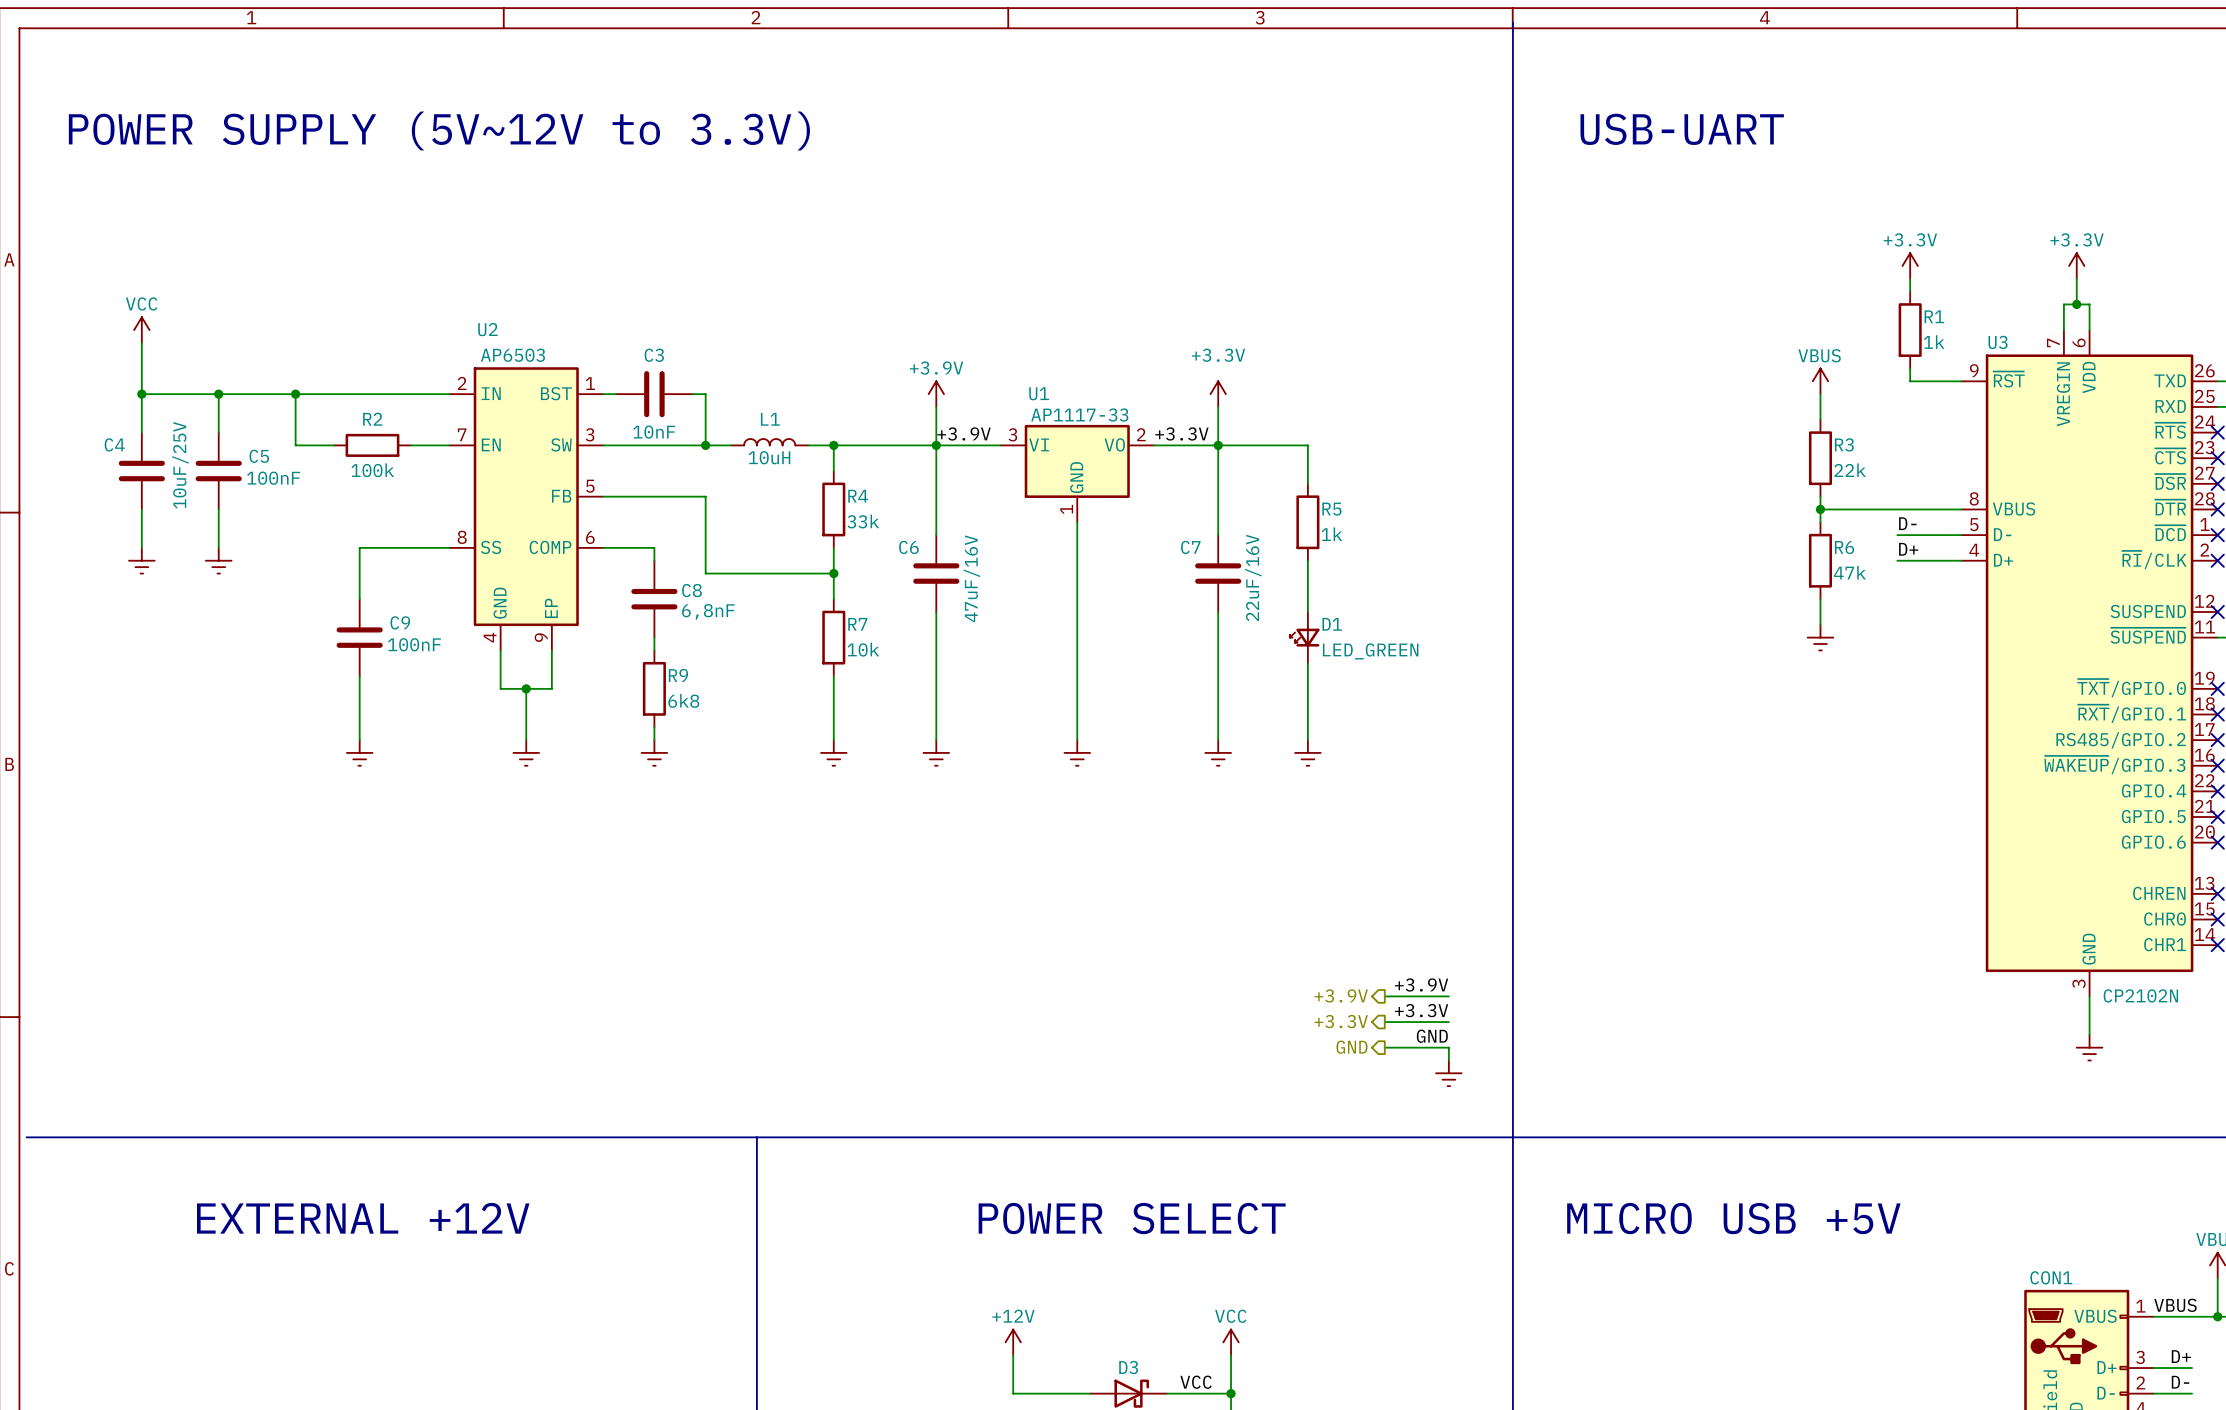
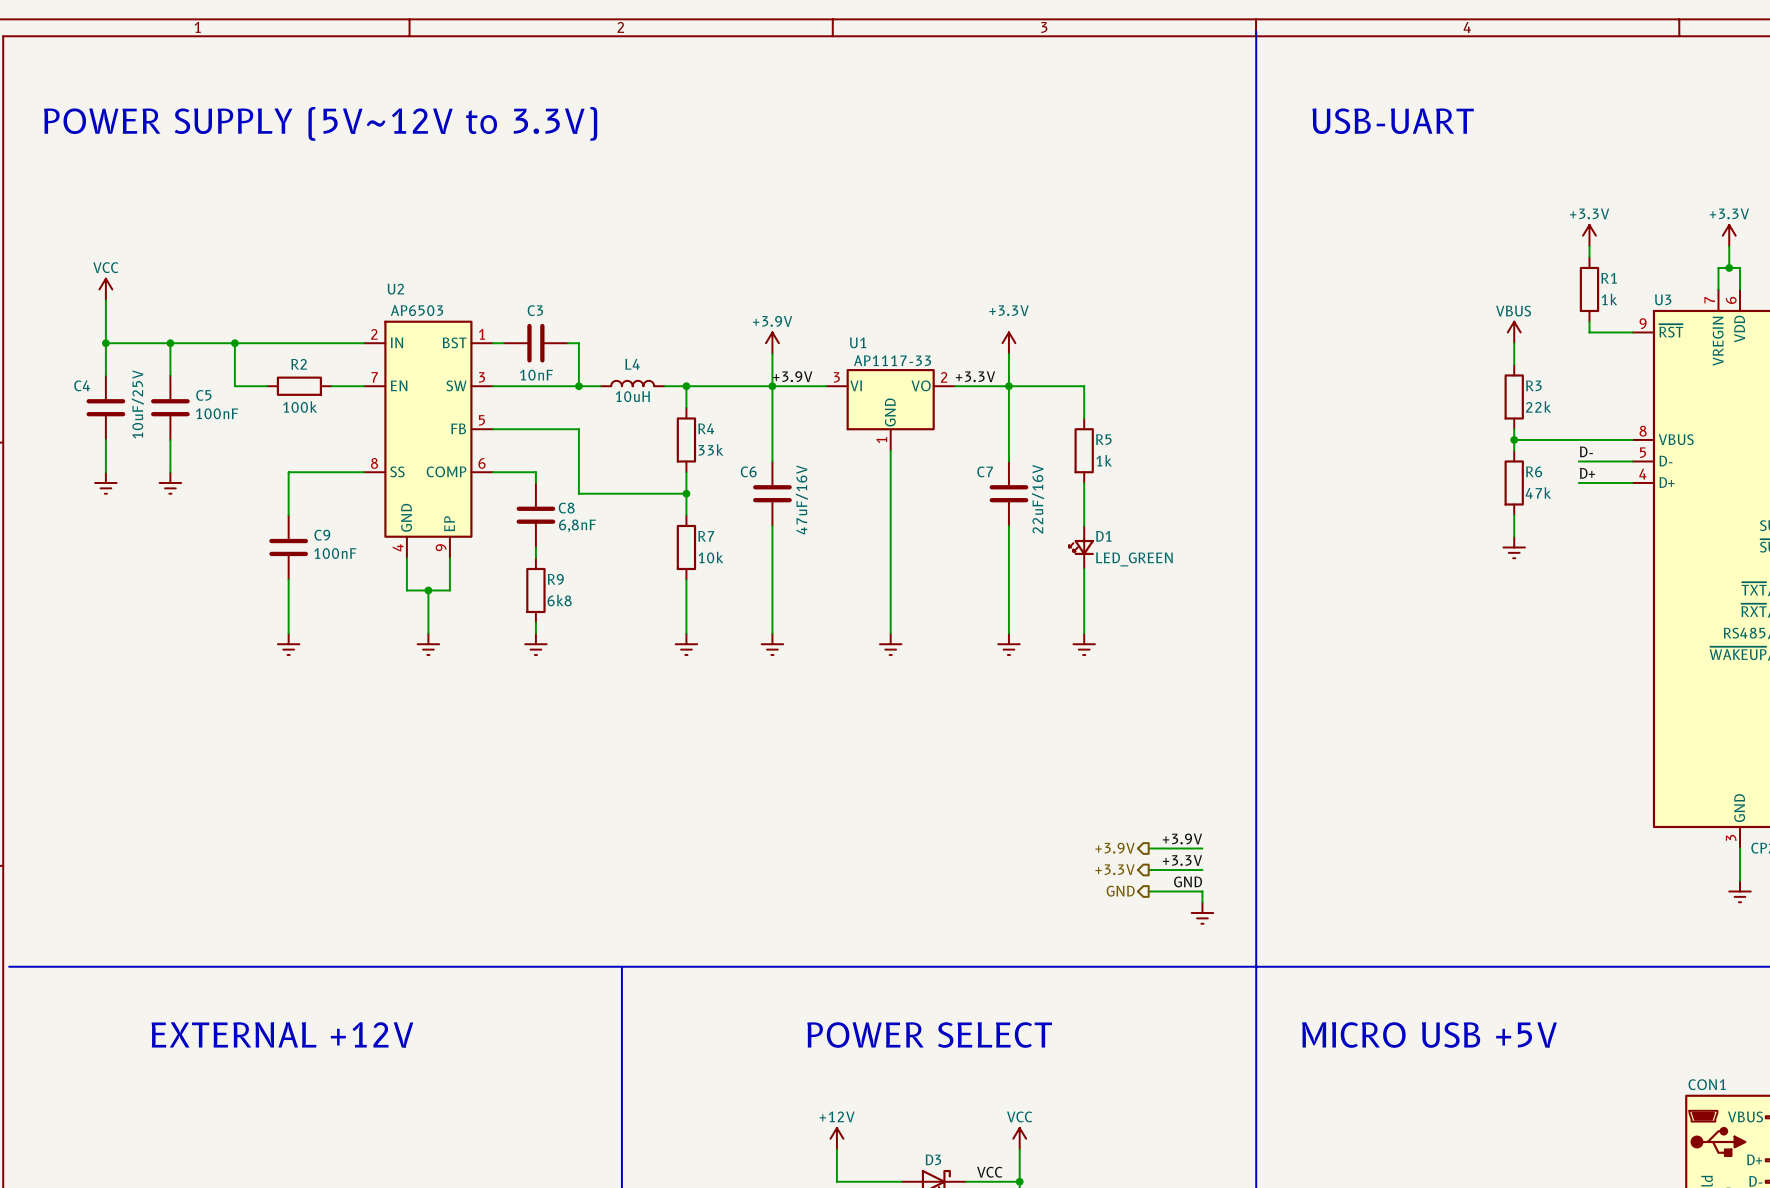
L1 name: L1 (770, 419) -> L4 (632, 364)

